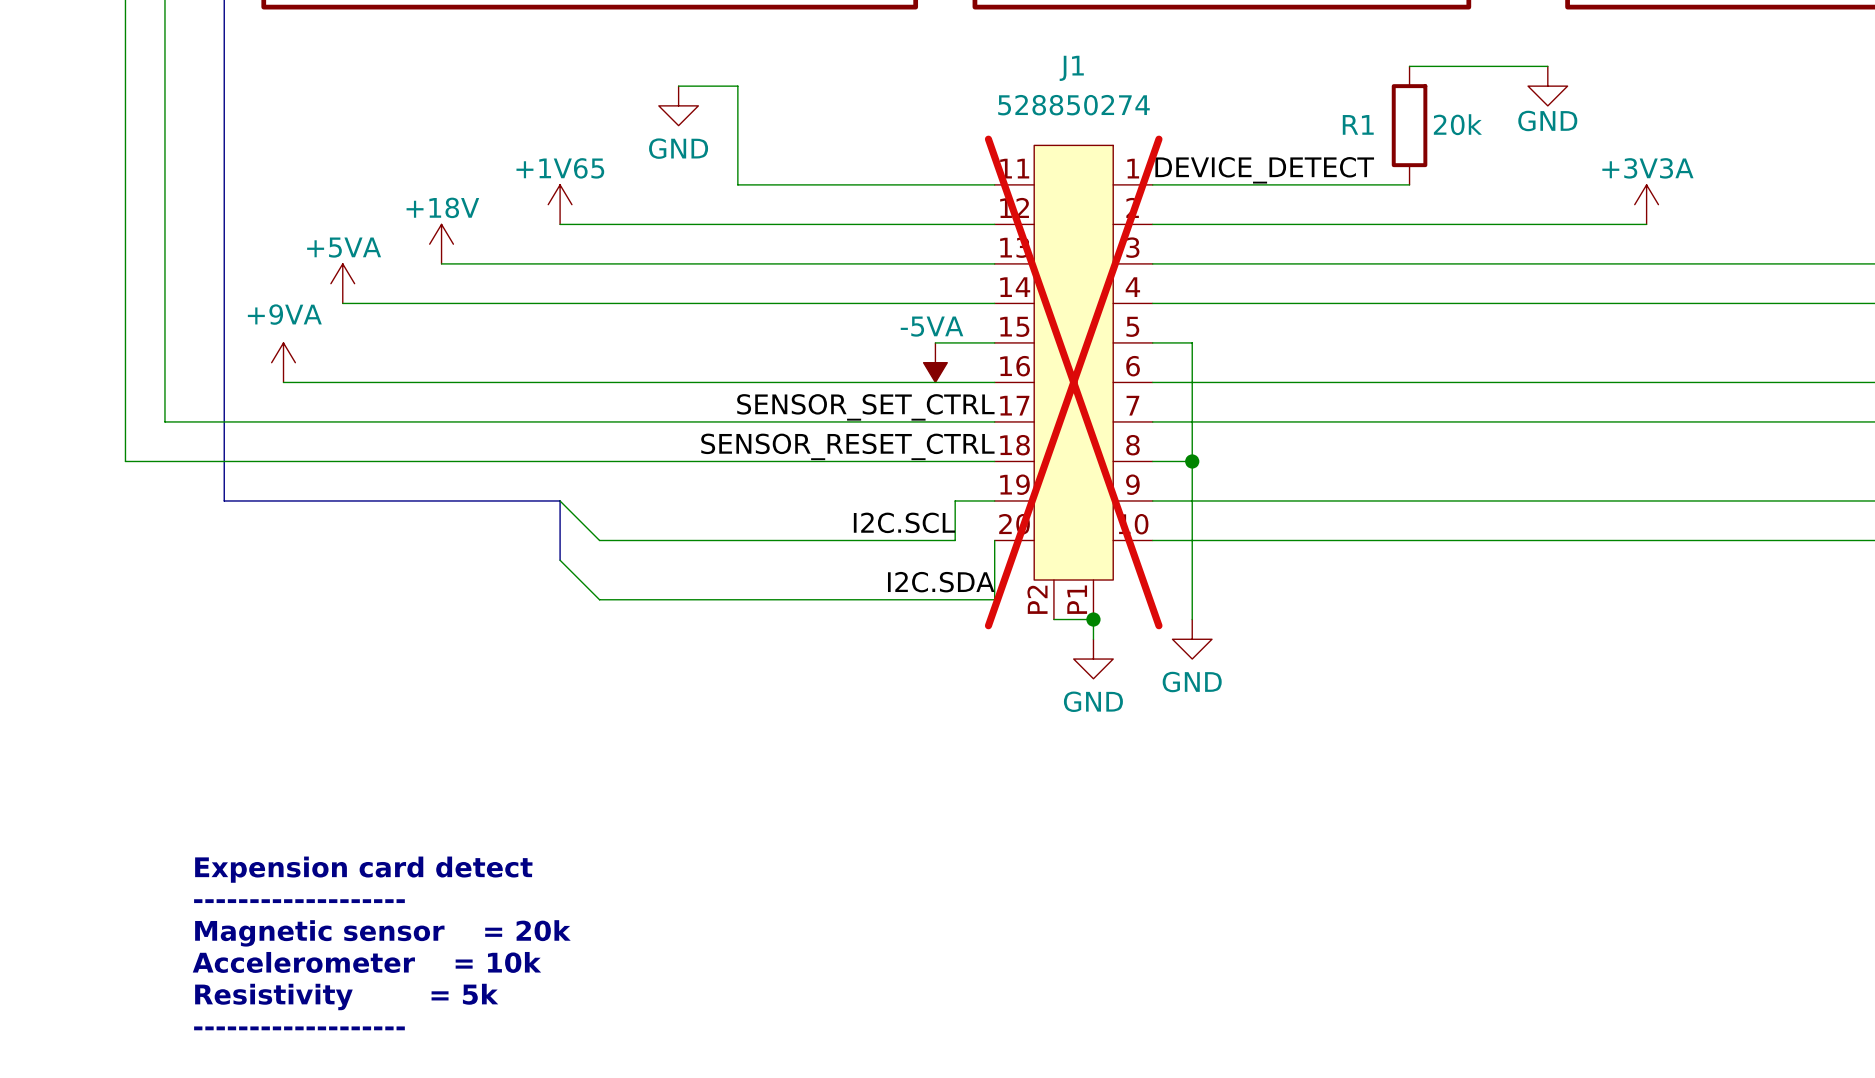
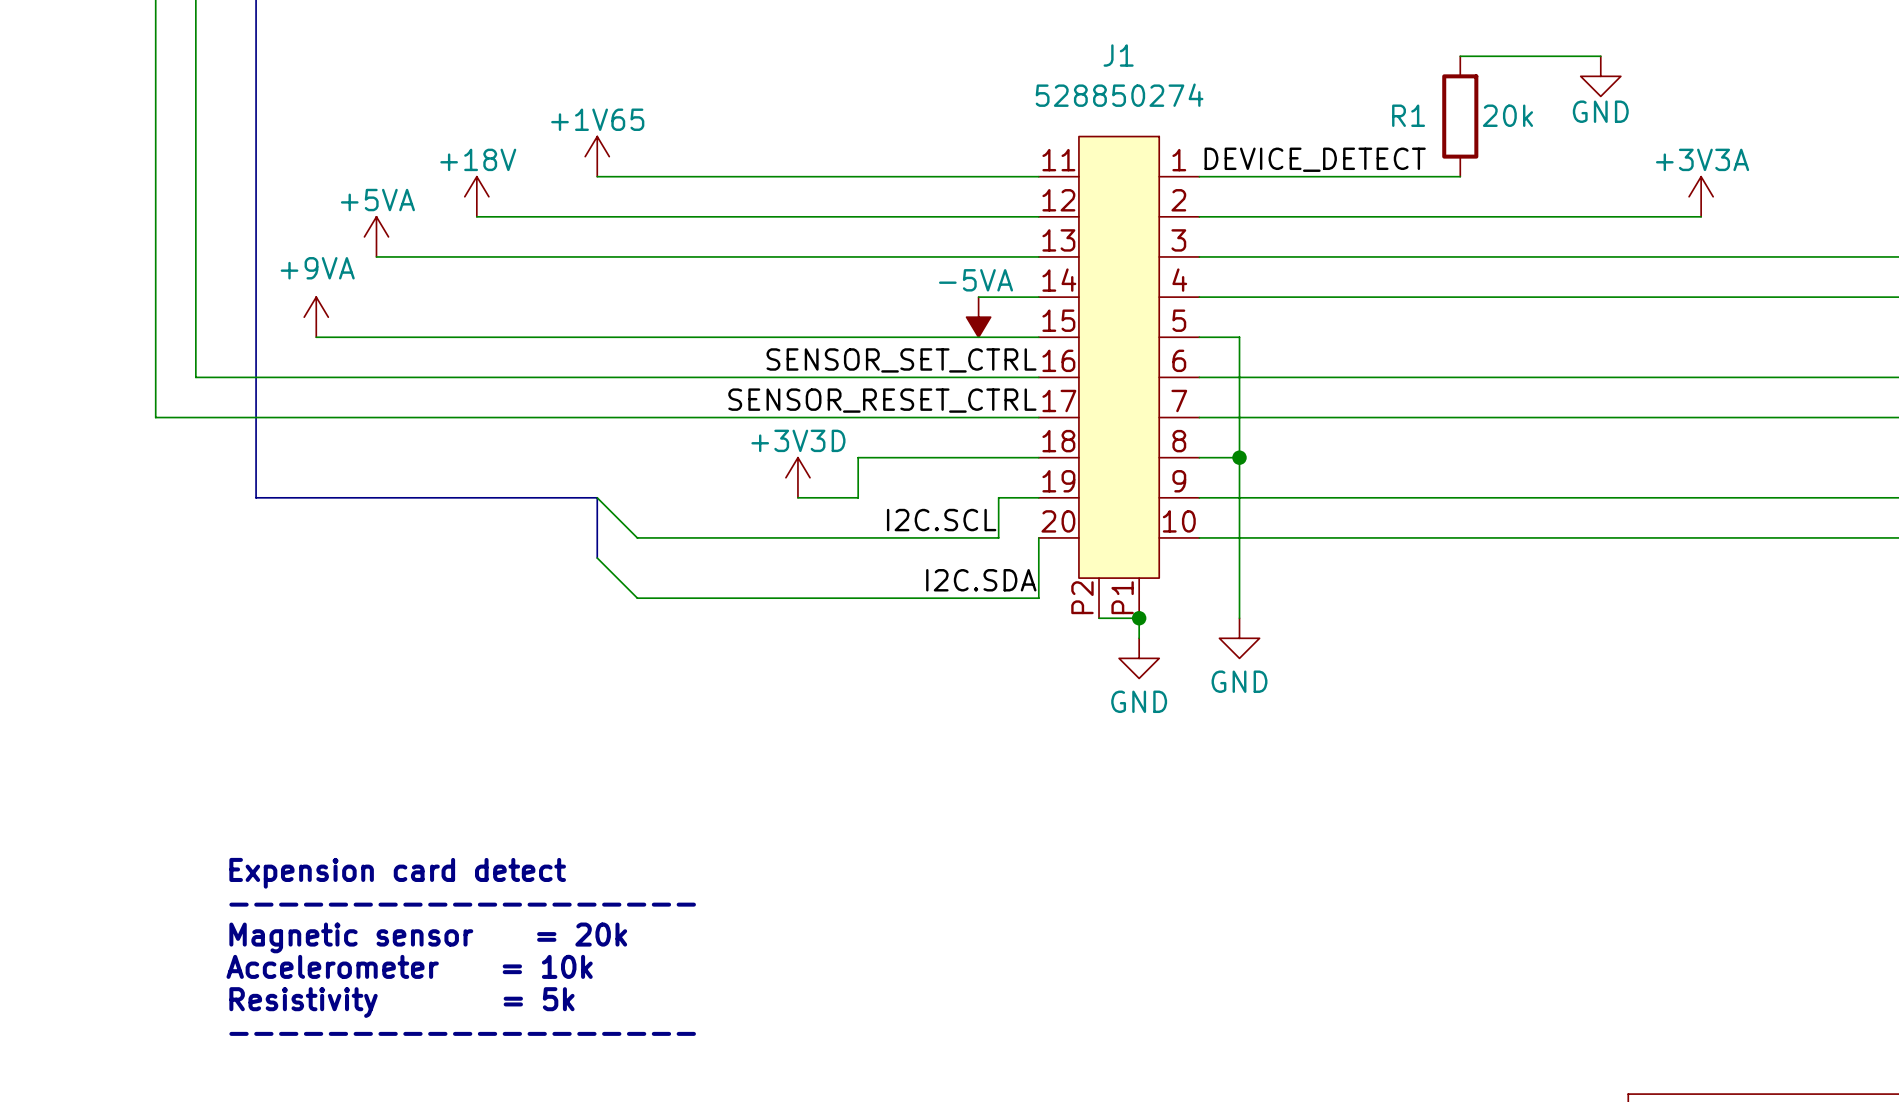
wire: (678, 86) (737, 86) (737, 184) -> (597, 176) (777, 176)
power symbol: GND (678, 105) -> none
power symbol position: +1V65 (560, 204) -> +1V65 (597, 156)
wire: none -> (476, 216) (597, 216)
power symbol position: +18V (441, 244) -> +18V (476, 196)
wire: none -> (376, 256) (476, 256)
power symbol position: +5VA (342, 283) -> +5VA (376, 236)
wire: (342, 303) (935, 303) -> none
wire: none -> (316, 337) (978, 337)
power symbol position: +9VA (283, 362) -> +9VA (316, 317)
power symbol position: -5VA (935, 362) -> -5VA (978, 317)
label: none -> SENSOR_SET_CTRL (901, 360)
wire: (164, 382) (164, 421) -> (155, 417) (195, 417)
wire: none -> (195, 377) (316, 377)
J1 do-not-place cross: (1073, 382) -> none
label: SENSOR_SET_CTRL (865, 407) -> SENSOR_RESET_CTRL (882, 400)
wire: (125, 421) (125, 461) (816, 461) -> (797, 497) (858, 497) (858, 457)
label: SENSOR_RESET_CTRL (847, 446) -> none
power symbol: none -> +3V3D (797, 477)

